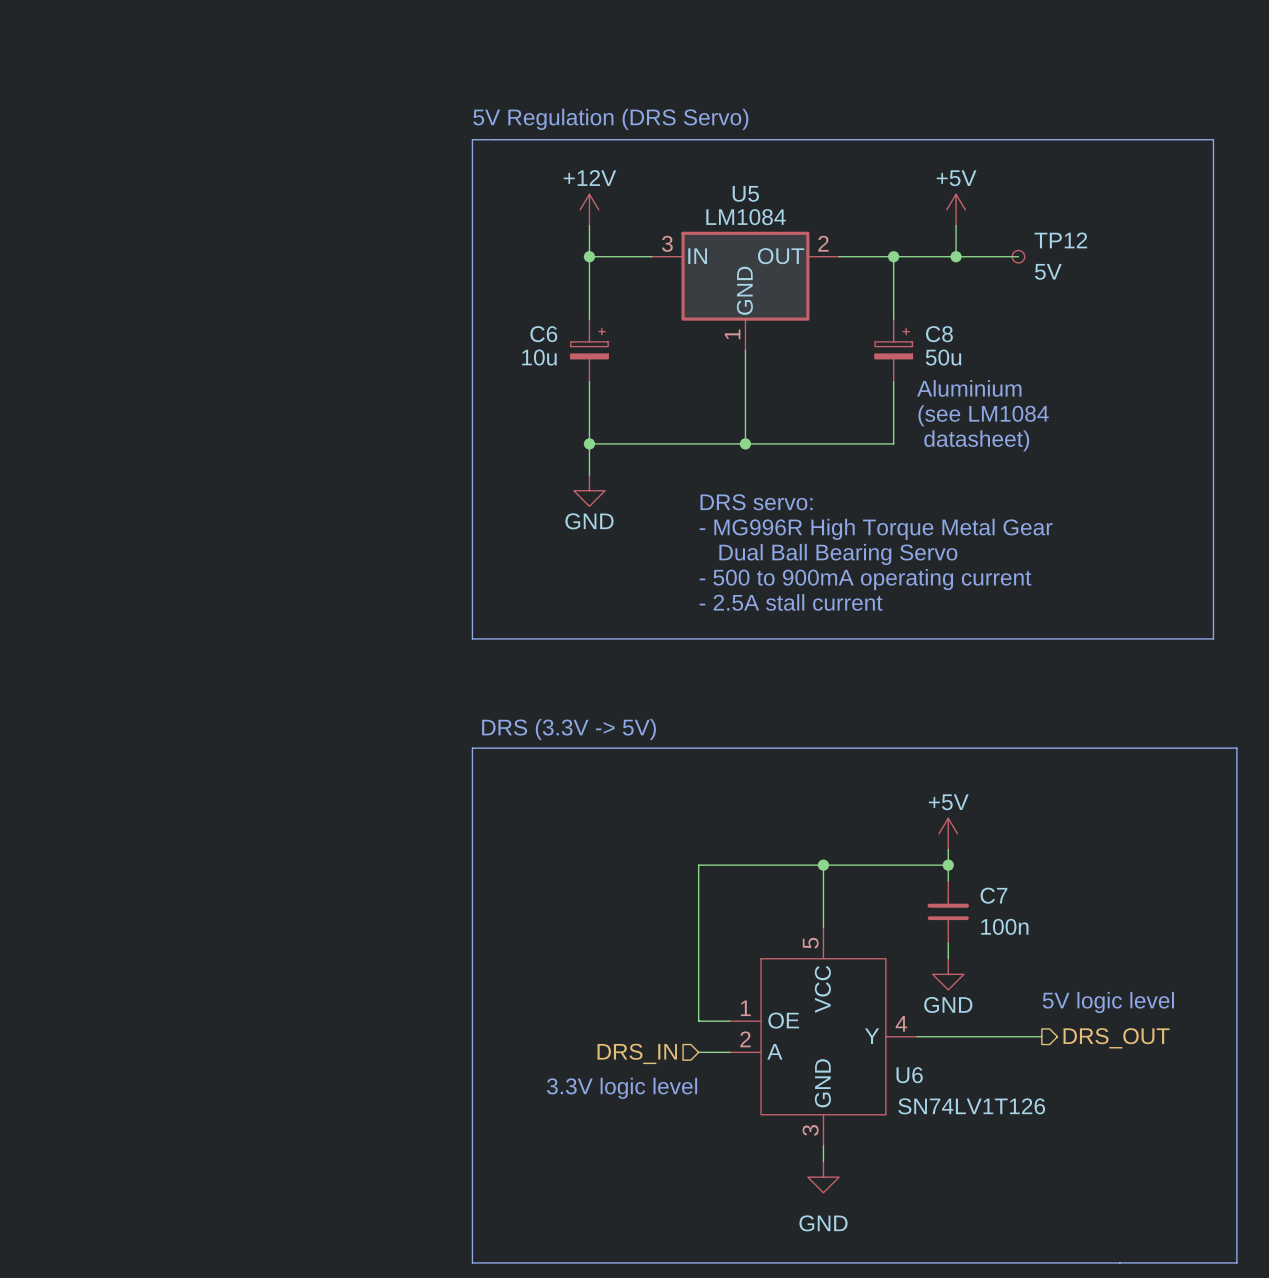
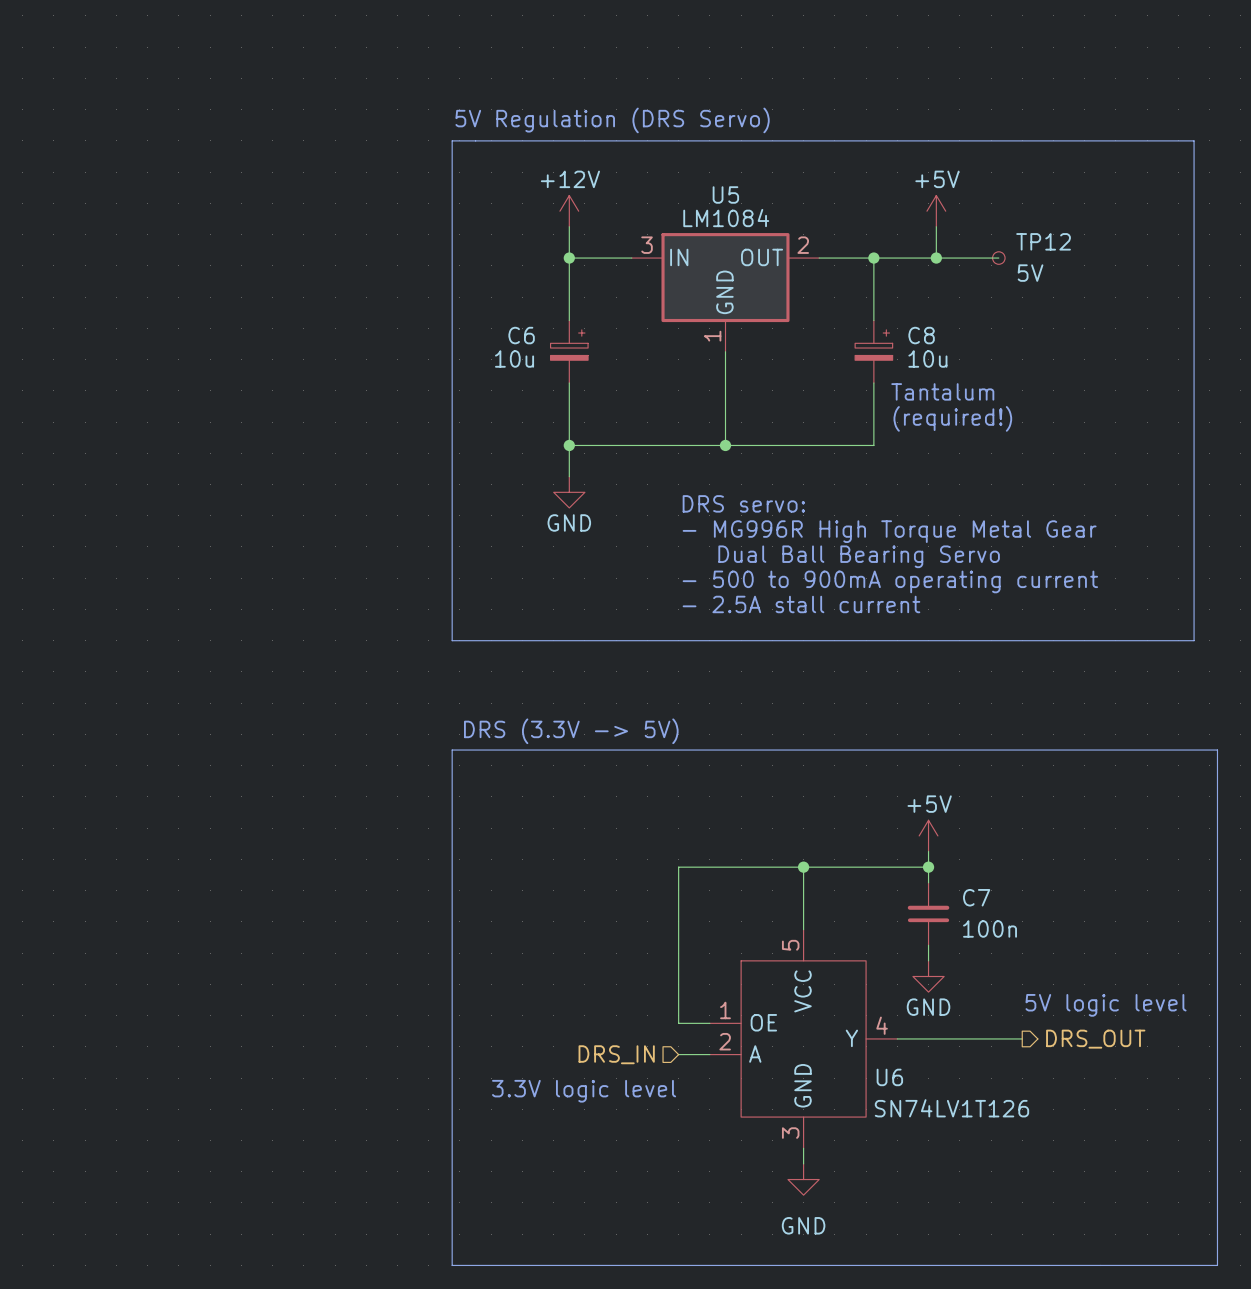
C8 value: 50u (943, 357) -> 10u (927, 358)
text: Aluminium (969, 388) -> Tantalum (942, 391)
text: (see LM1084 (983, 415) -> (required!) (952, 418)
text: datasheet) (976, 440) -> none

